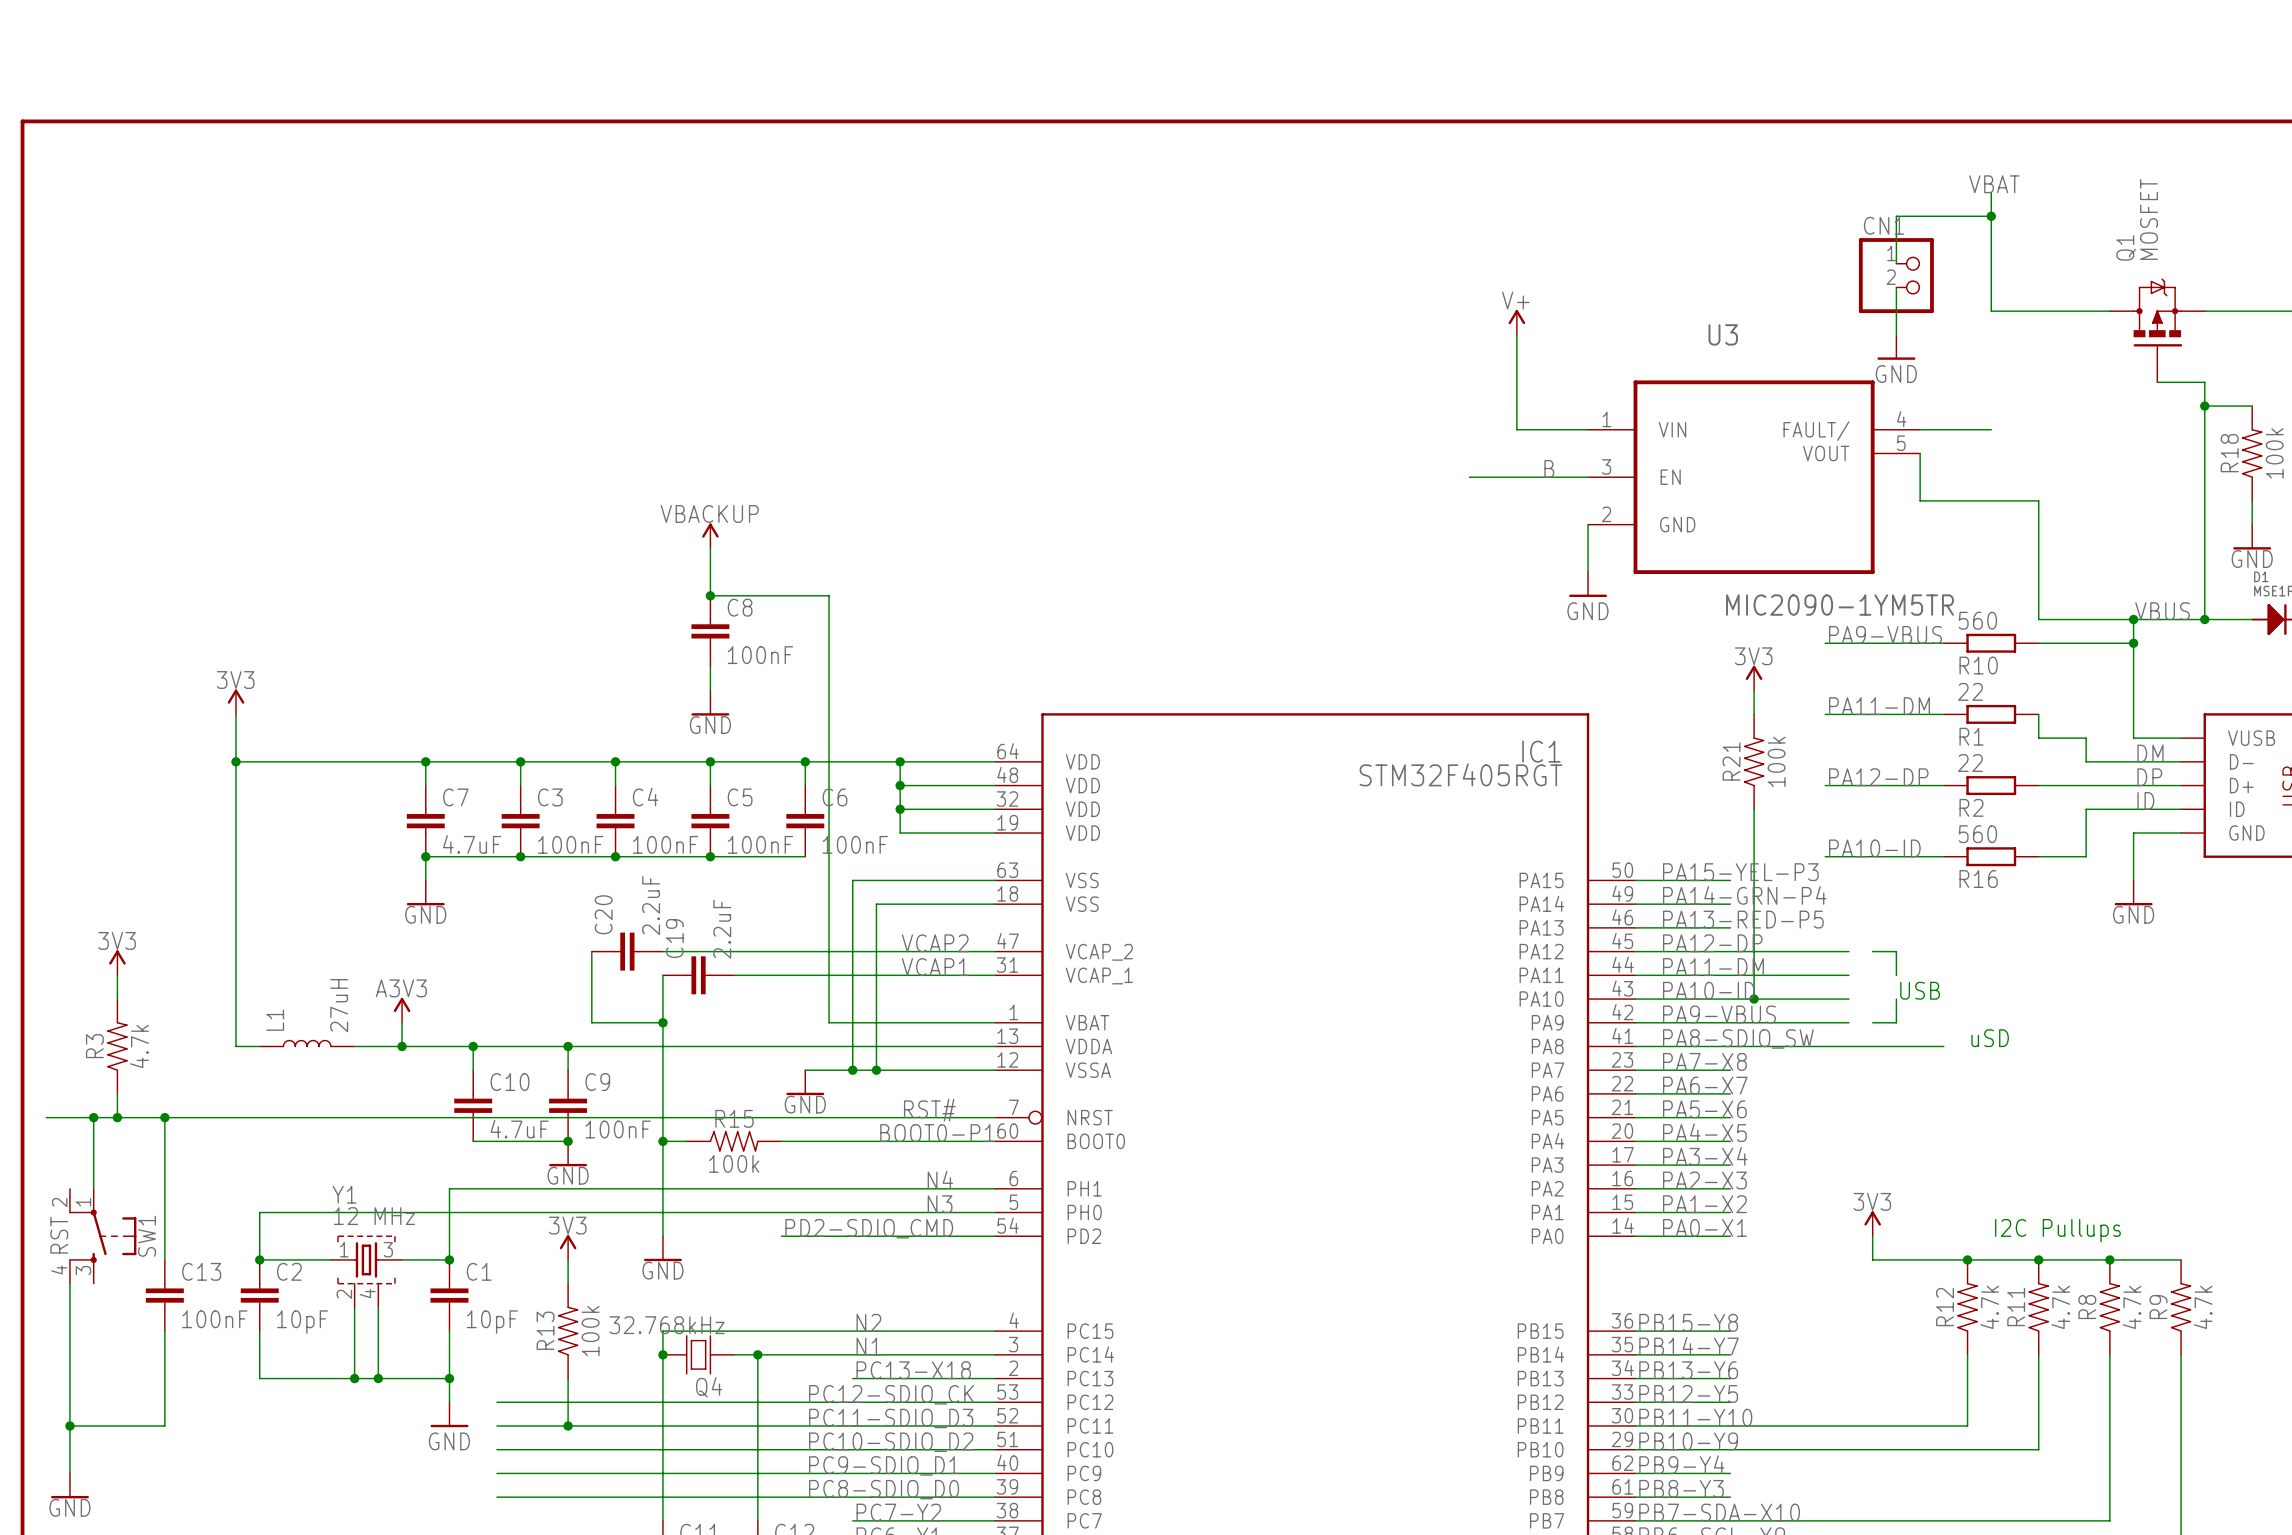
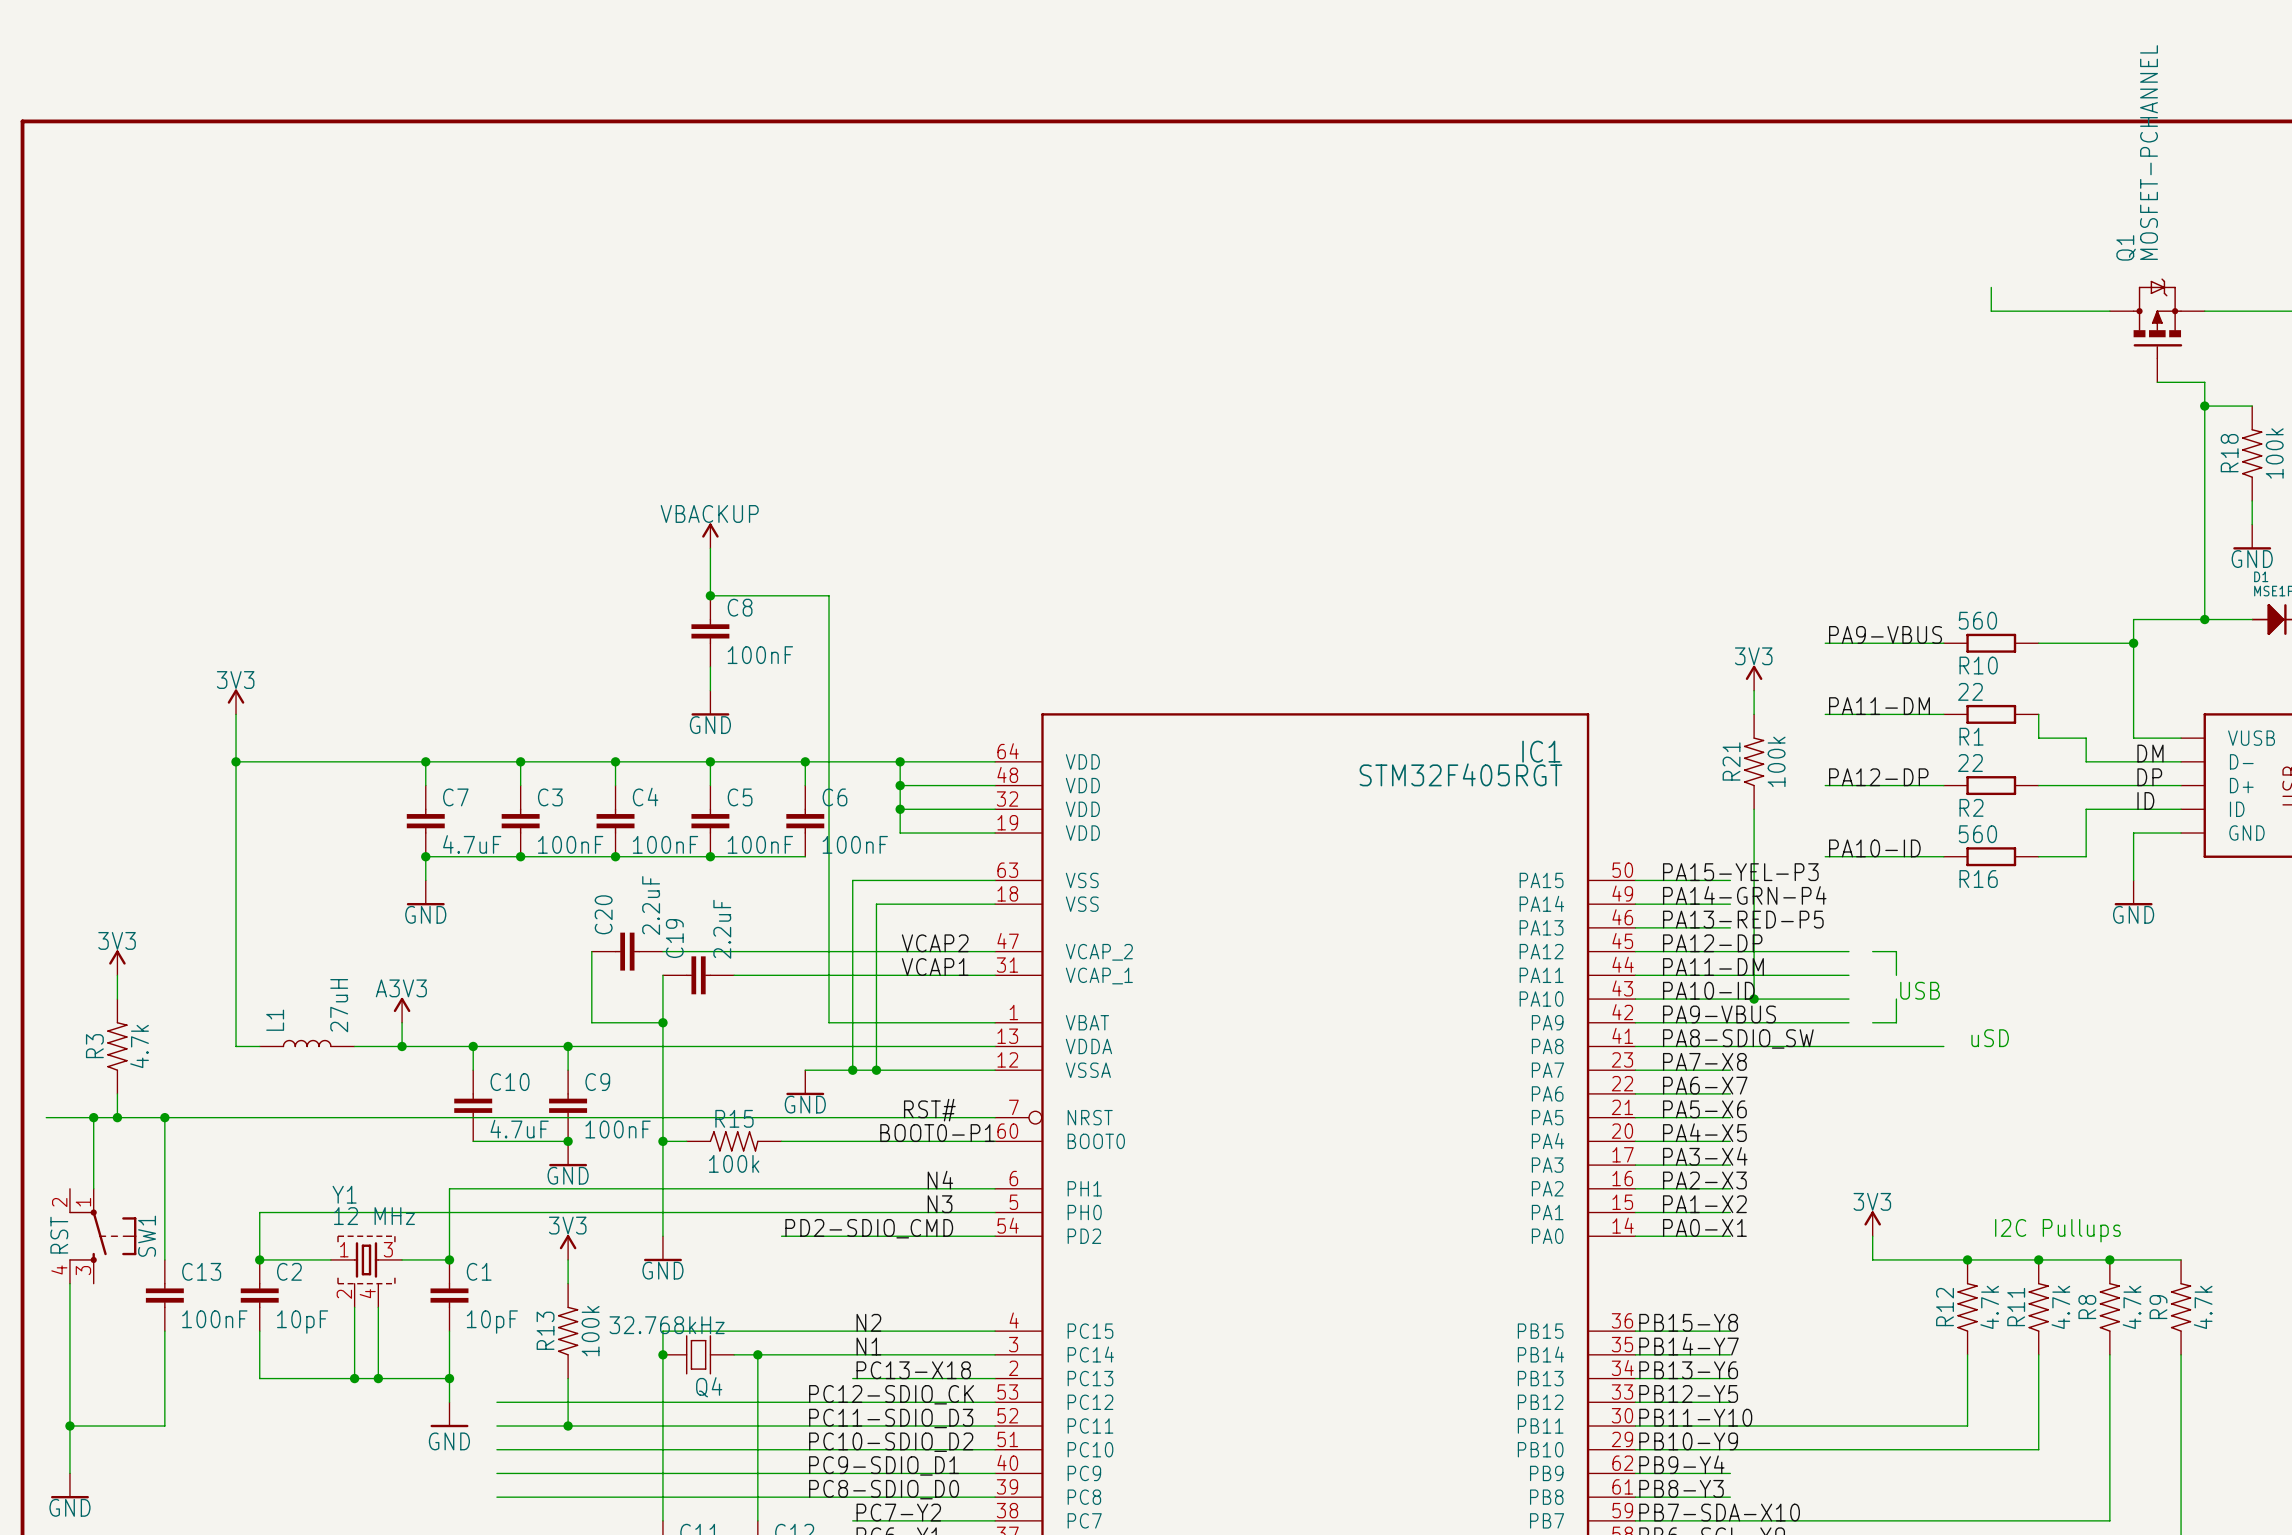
label: VBAT (1994, 184) -> none
wire: (1991, 192) (1991, 287) -> none
wire: (1991, 216) (1896, 216) (1896, 263) -> none
junction: (1991, 216) -> none
Q1 value: MOSFET (2149, 219) -> MOSFET-PCHANNEL (2149, 152)
CN1: (1896, 275) -> none
wire: (1896, 287) (1896, 334) -> none
power symbol: V+ (1516, 322) -> none
wire: (1516, 334) (1516, 429) (1588, 429) -> none
power symbol: GND (1896, 347) -> none
wire: (1920, 429) (1991, 429) -> none
wire: (1920, 453) (1920, 500) (2038, 500) (2038, 619) (2133, 619) -> none
label: B (1549, 468) -> none
wire: (1469, 477) (1588, 477) -> none
U3: MIC2090-1YM5TR (1754, 477) -> none
wire: (1588, 524) (1588, 572) -> none
power symbol: GND (1588, 584) -> none
label: VBUS (2162, 611) -> none
junction: (2133, 619) -> none

